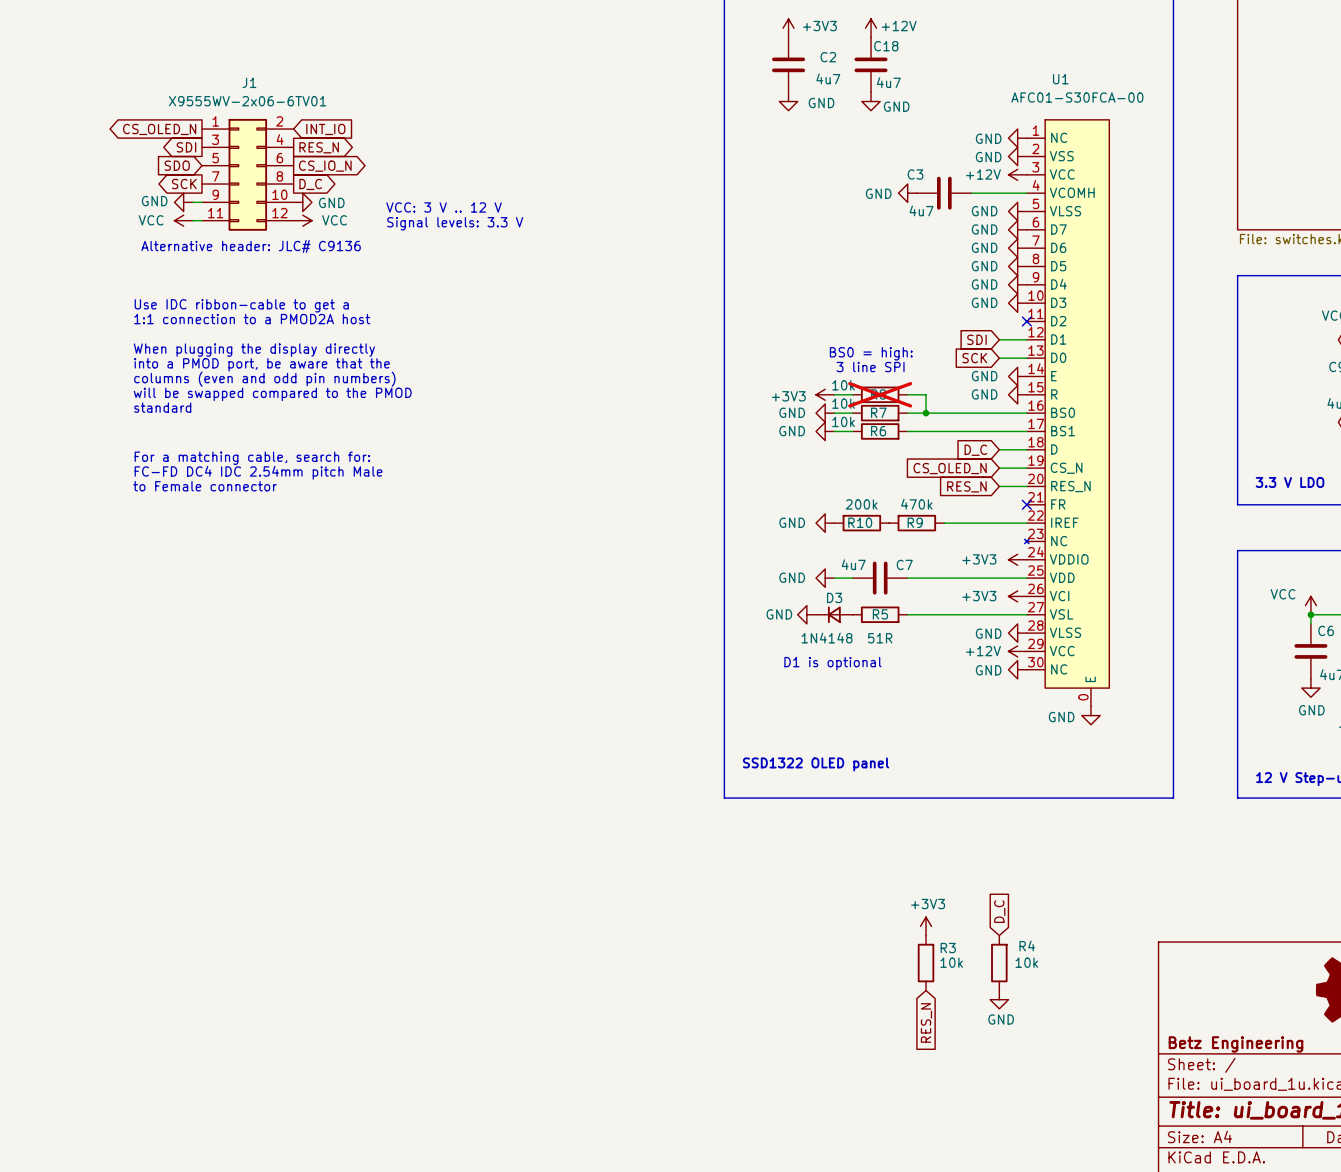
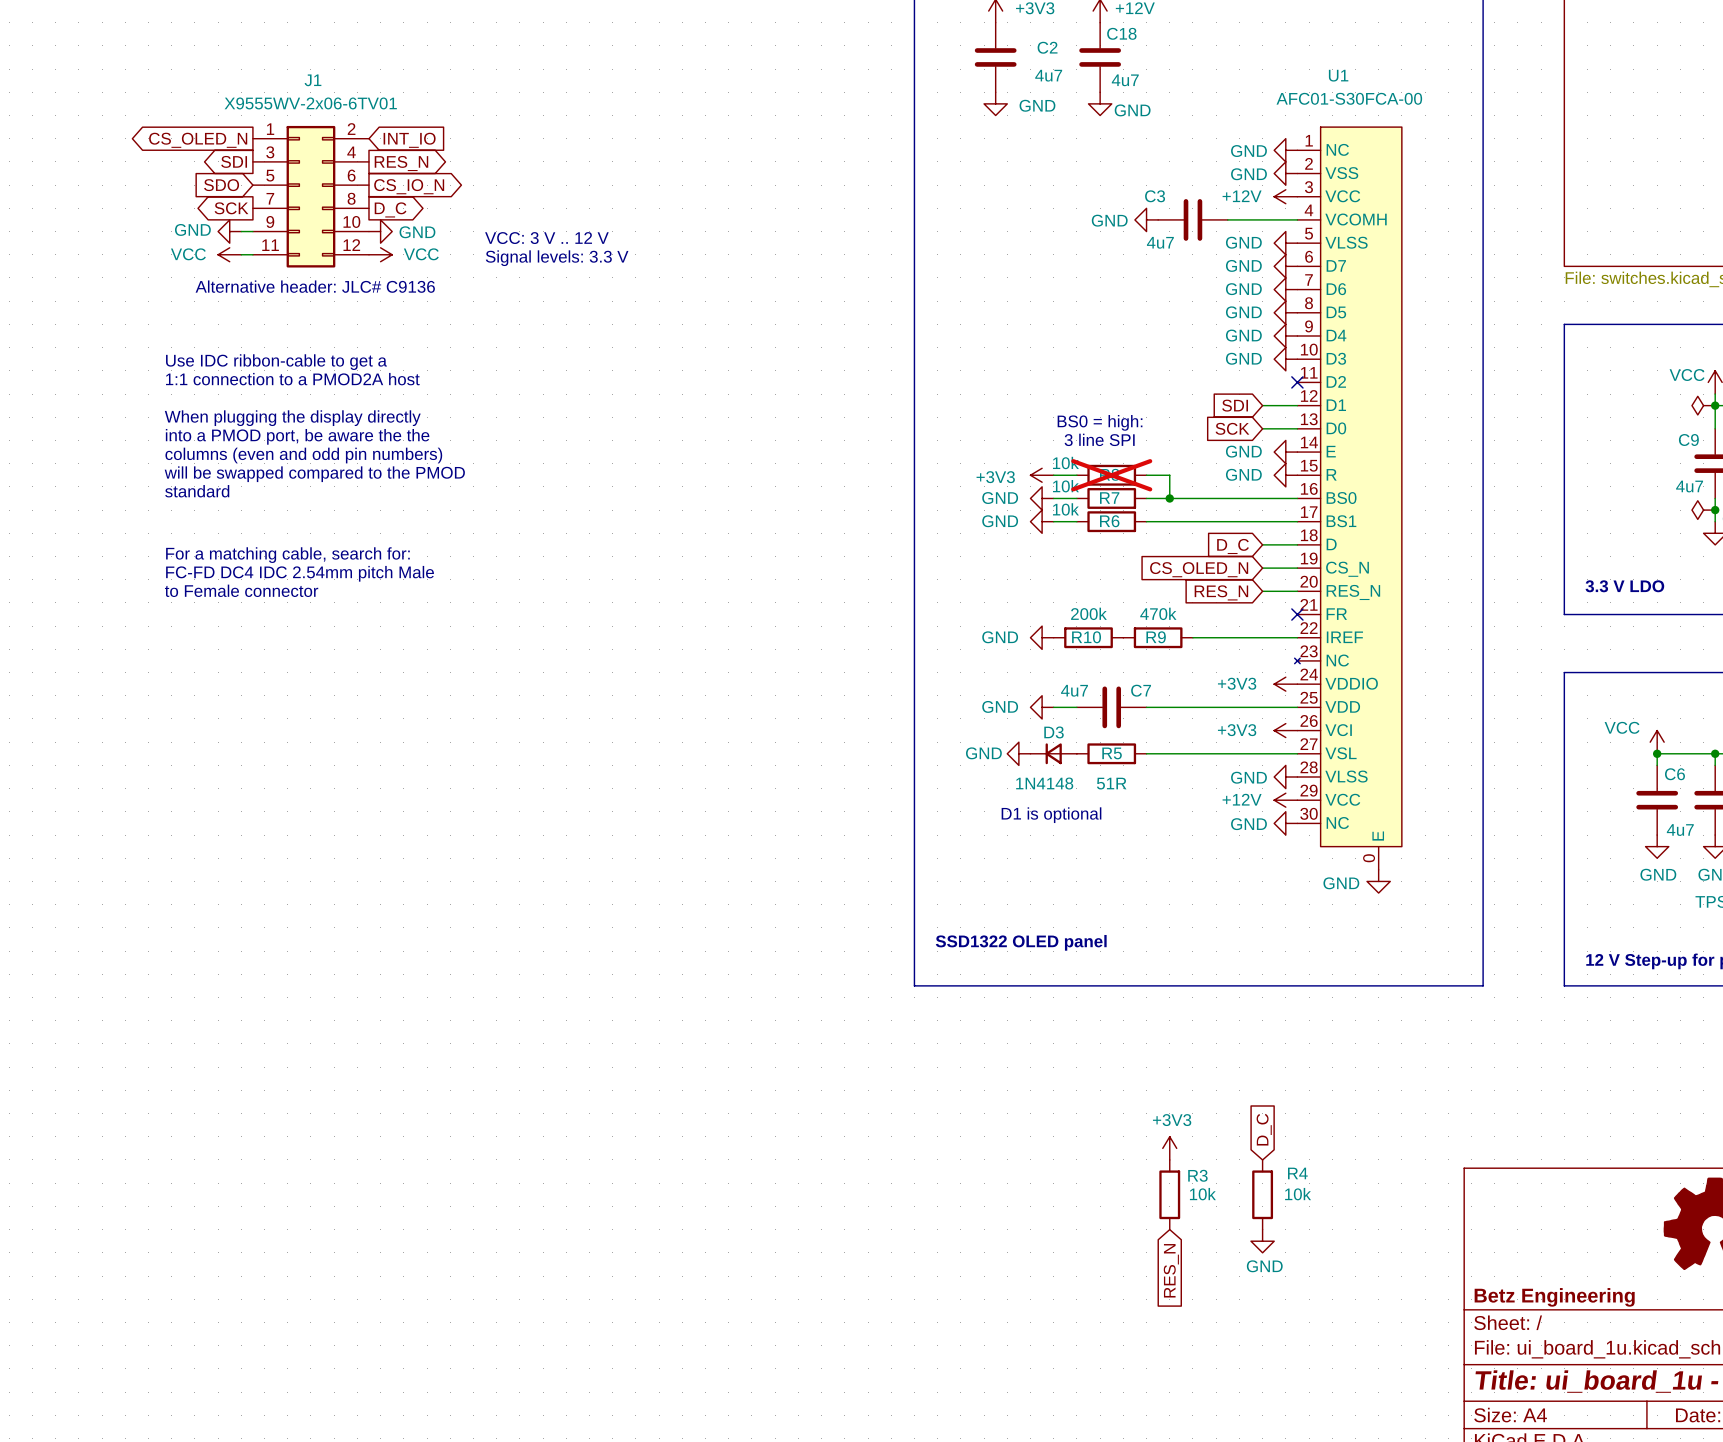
text: into a PMOD port, be aware that the (262, 364) -> into a PMOD port, be aware the the (297, 436)

